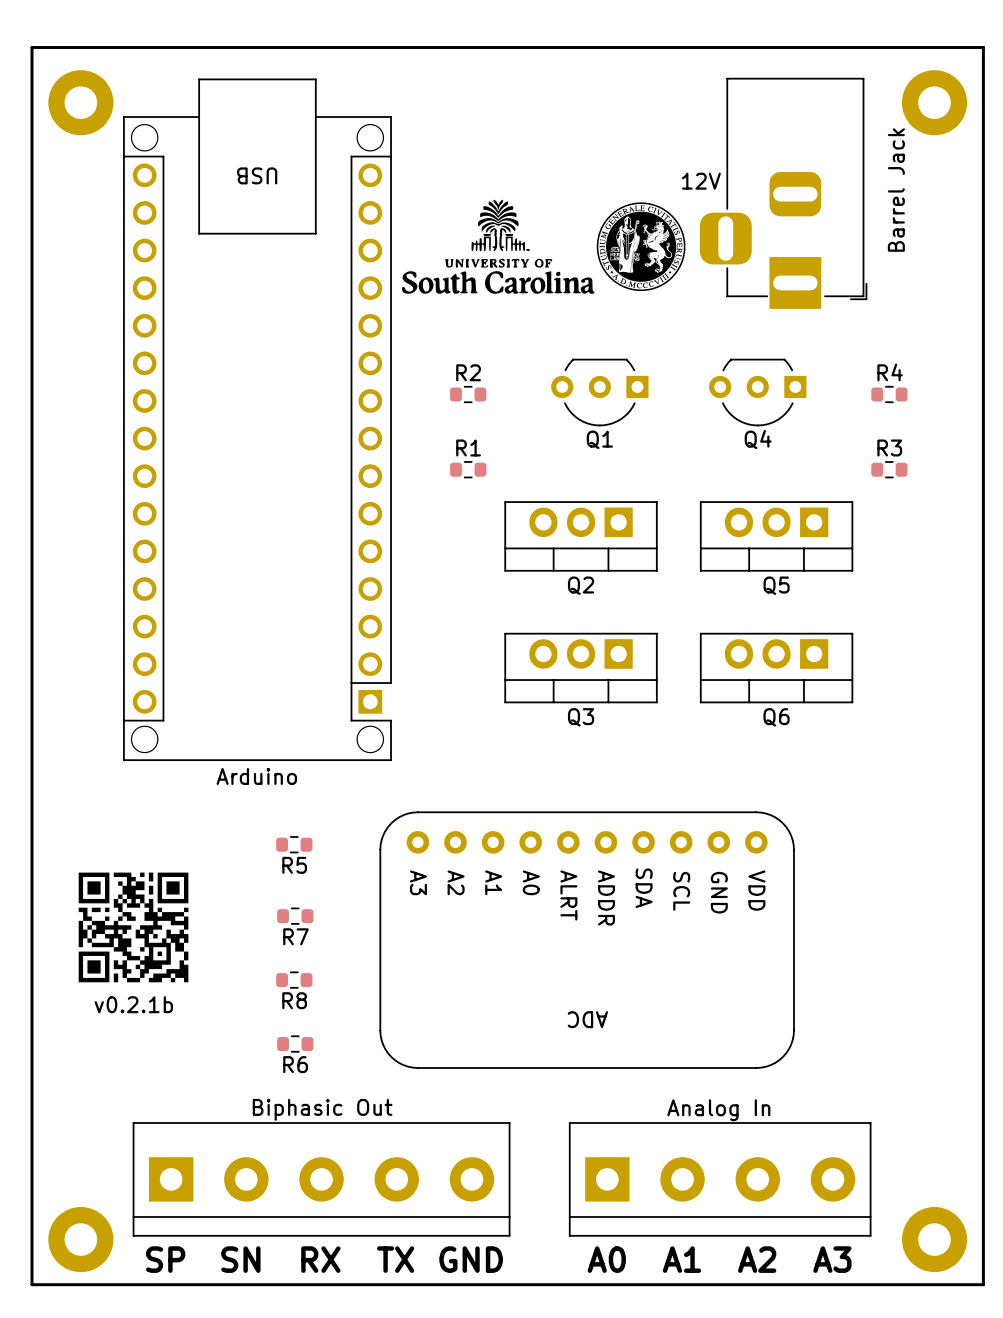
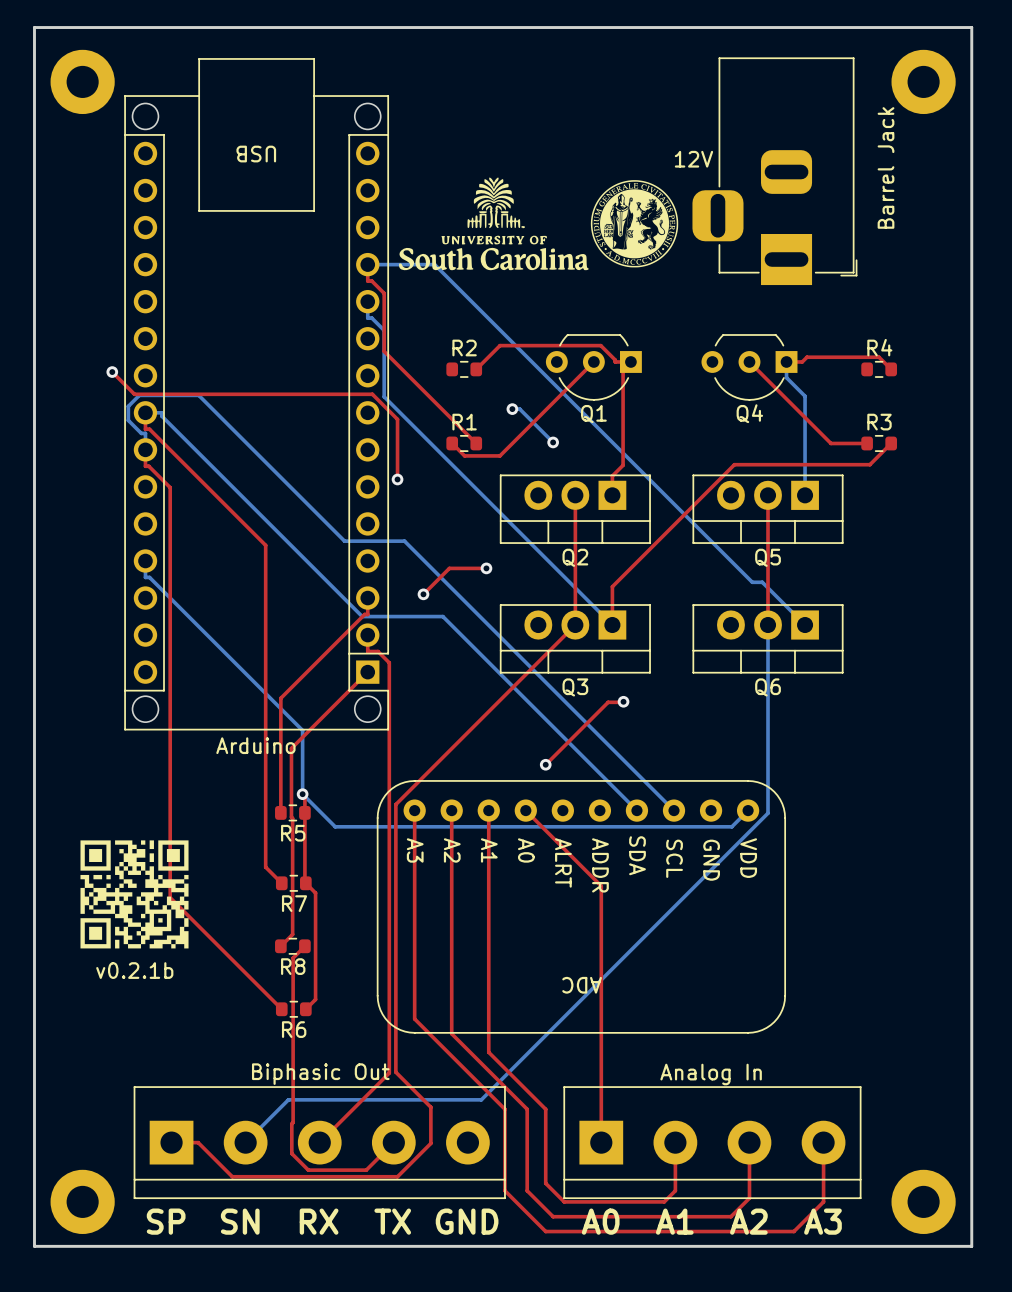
top track: none -> (367, 264) (367, 281) (371, 281) (384, 293) (384, 351) (476, 443)
bottom track: none -> (367, 264) (434, 264) (752, 582) (762, 582) (805, 625)
bottom track: none -> (367, 301) (367, 318) (371, 318) (384, 330) (384, 396) (612, 625)
top track: none -> (593, 361) (499, 455) (464, 455) (452, 443)
top track: none -> (623, 361) (623, 465) (612, 475) (612, 495)
top track: none -> (630, 361) (615, 361) (600, 345) (500, 345) (476, 369)
top track: none -> (749, 361) (830, 443) (867, 443)
top track: none -> (786, 361) (802, 361) (806, 357) (879, 357) (891, 369)
bottom track: none -> (786, 361) (786, 377) (805, 396) (805, 495)
top track: none -> (112, 372) (134, 394) (372, 394) (397, 419) (397, 479)
via: none -> (112, 372)
bottom track: none -> (512, 409) (519, 409) (553, 442)
via: none -> (512, 409)
top track: none -> (145, 412) (145, 429) (149, 429) (265, 545) (265, 867) (281, 883)
bottom track: none -> (145, 412) (161, 412) (161, 416) (362, 616) (442, 616) (636, 810)
via: none -> (553, 442)
top track: none -> (891, 443) (869, 464) (734, 464) (612, 586) (612, 625)
top track: none -> (145, 449) (145, 466) (148, 466) (170, 487) (170, 897) (281, 1009)
bottom track: none -> (145, 449) (145, 433) (141, 433) (128, 420) (128, 406) (139, 395) (198, 395) (344, 541) (404, 541) (674, 810)
via: none -> (397, 479)
top track: none -> (575, 495) (575, 625) (395, 804) (395, 1072) (430, 1107) (430, 1143) (397, 1176) (232, 1176) (198, 1142) (171, 1142)
top track: none -> (768, 495) (768, 625)
bottom track: none -> (145, 560) (145, 577) (149, 577) (302, 730) (302, 794) (335, 826) (731, 826) (748, 810)
top track: none -> (486, 568) (449, 568) (423, 594)
via: none -> (486, 568)
via: none -> (423, 594)
top track: none -> (367, 598) (367, 614) (364, 614) (280, 698) (280, 812)
bottom track: none -> (768, 625) (768, 813) (481, 1099) (288, 1099) (245, 1142)
top track: none -> (367, 635) (367, 651) (378, 651) (389, 662) (389, 1073) (319, 1142)
top track: none -> (367, 672) (291, 748) (292, 934) (280, 946)
via: none -> (623, 701)
top track: none -> (627, 701) (608, 702) (545, 764)
via: none -> (545, 764)
top track: none -> (302, 794) (304, 796) (304, 882) (315, 893) (315, 999) (305, 1009)
via: none -> (302, 794)
top track: none -> (414, 810) (414, 1018) (504, 1109) (504, 1190) (545, 1231) (793, 1231) (823, 1201) (823, 1142)
top track: none -> (451, 810) (451, 1033) (527, 1109) (527, 1190) (553, 1216) (730, 1216) (749, 1198) (749, 1142)
top track: none -> (488, 810) (488, 1052) (545, 1109) (545, 1183) (564, 1201) (664, 1201) (675, 1190) (675, 1142)
top track: none -> (525, 810) (601, 886) (601, 1142)
top track: none -> (304, 946) (293, 958) (291, 1153) (308, 1170) (366, 1170) (393, 1142)

